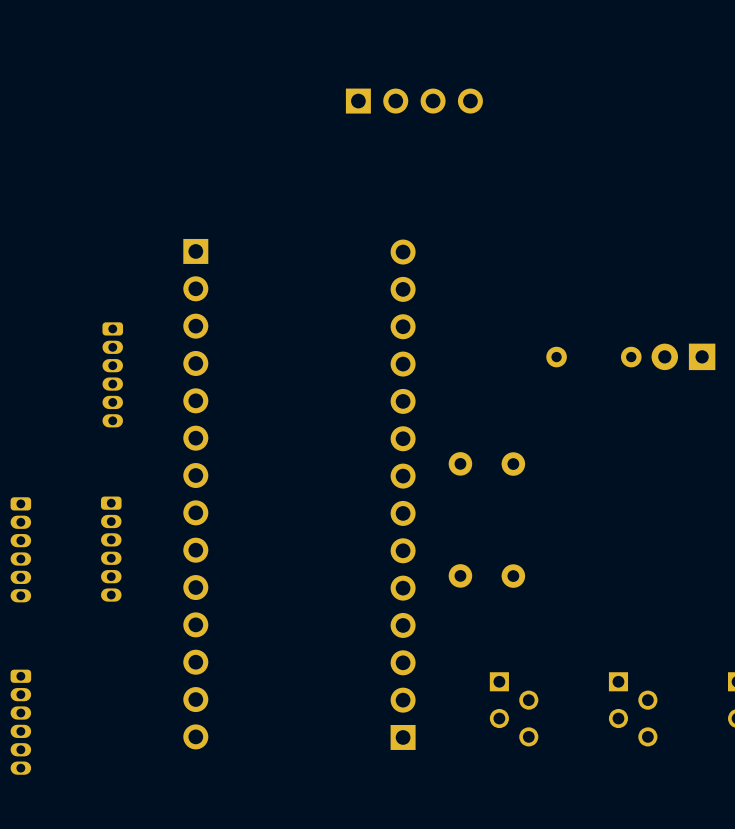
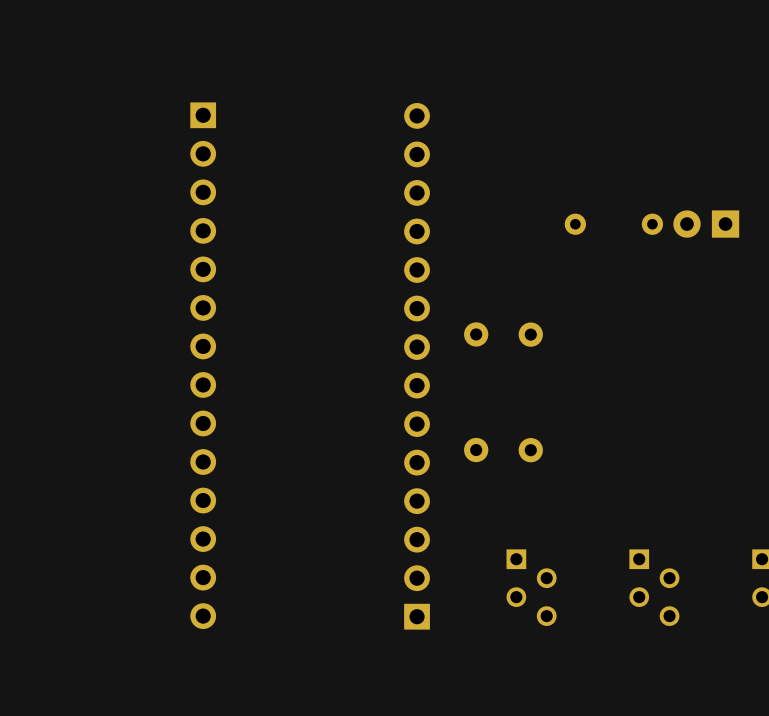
part: (112, 374) -> none
part: (20, 549) -> none
part: (111, 549) -> none
part: (20, 722) -> none

